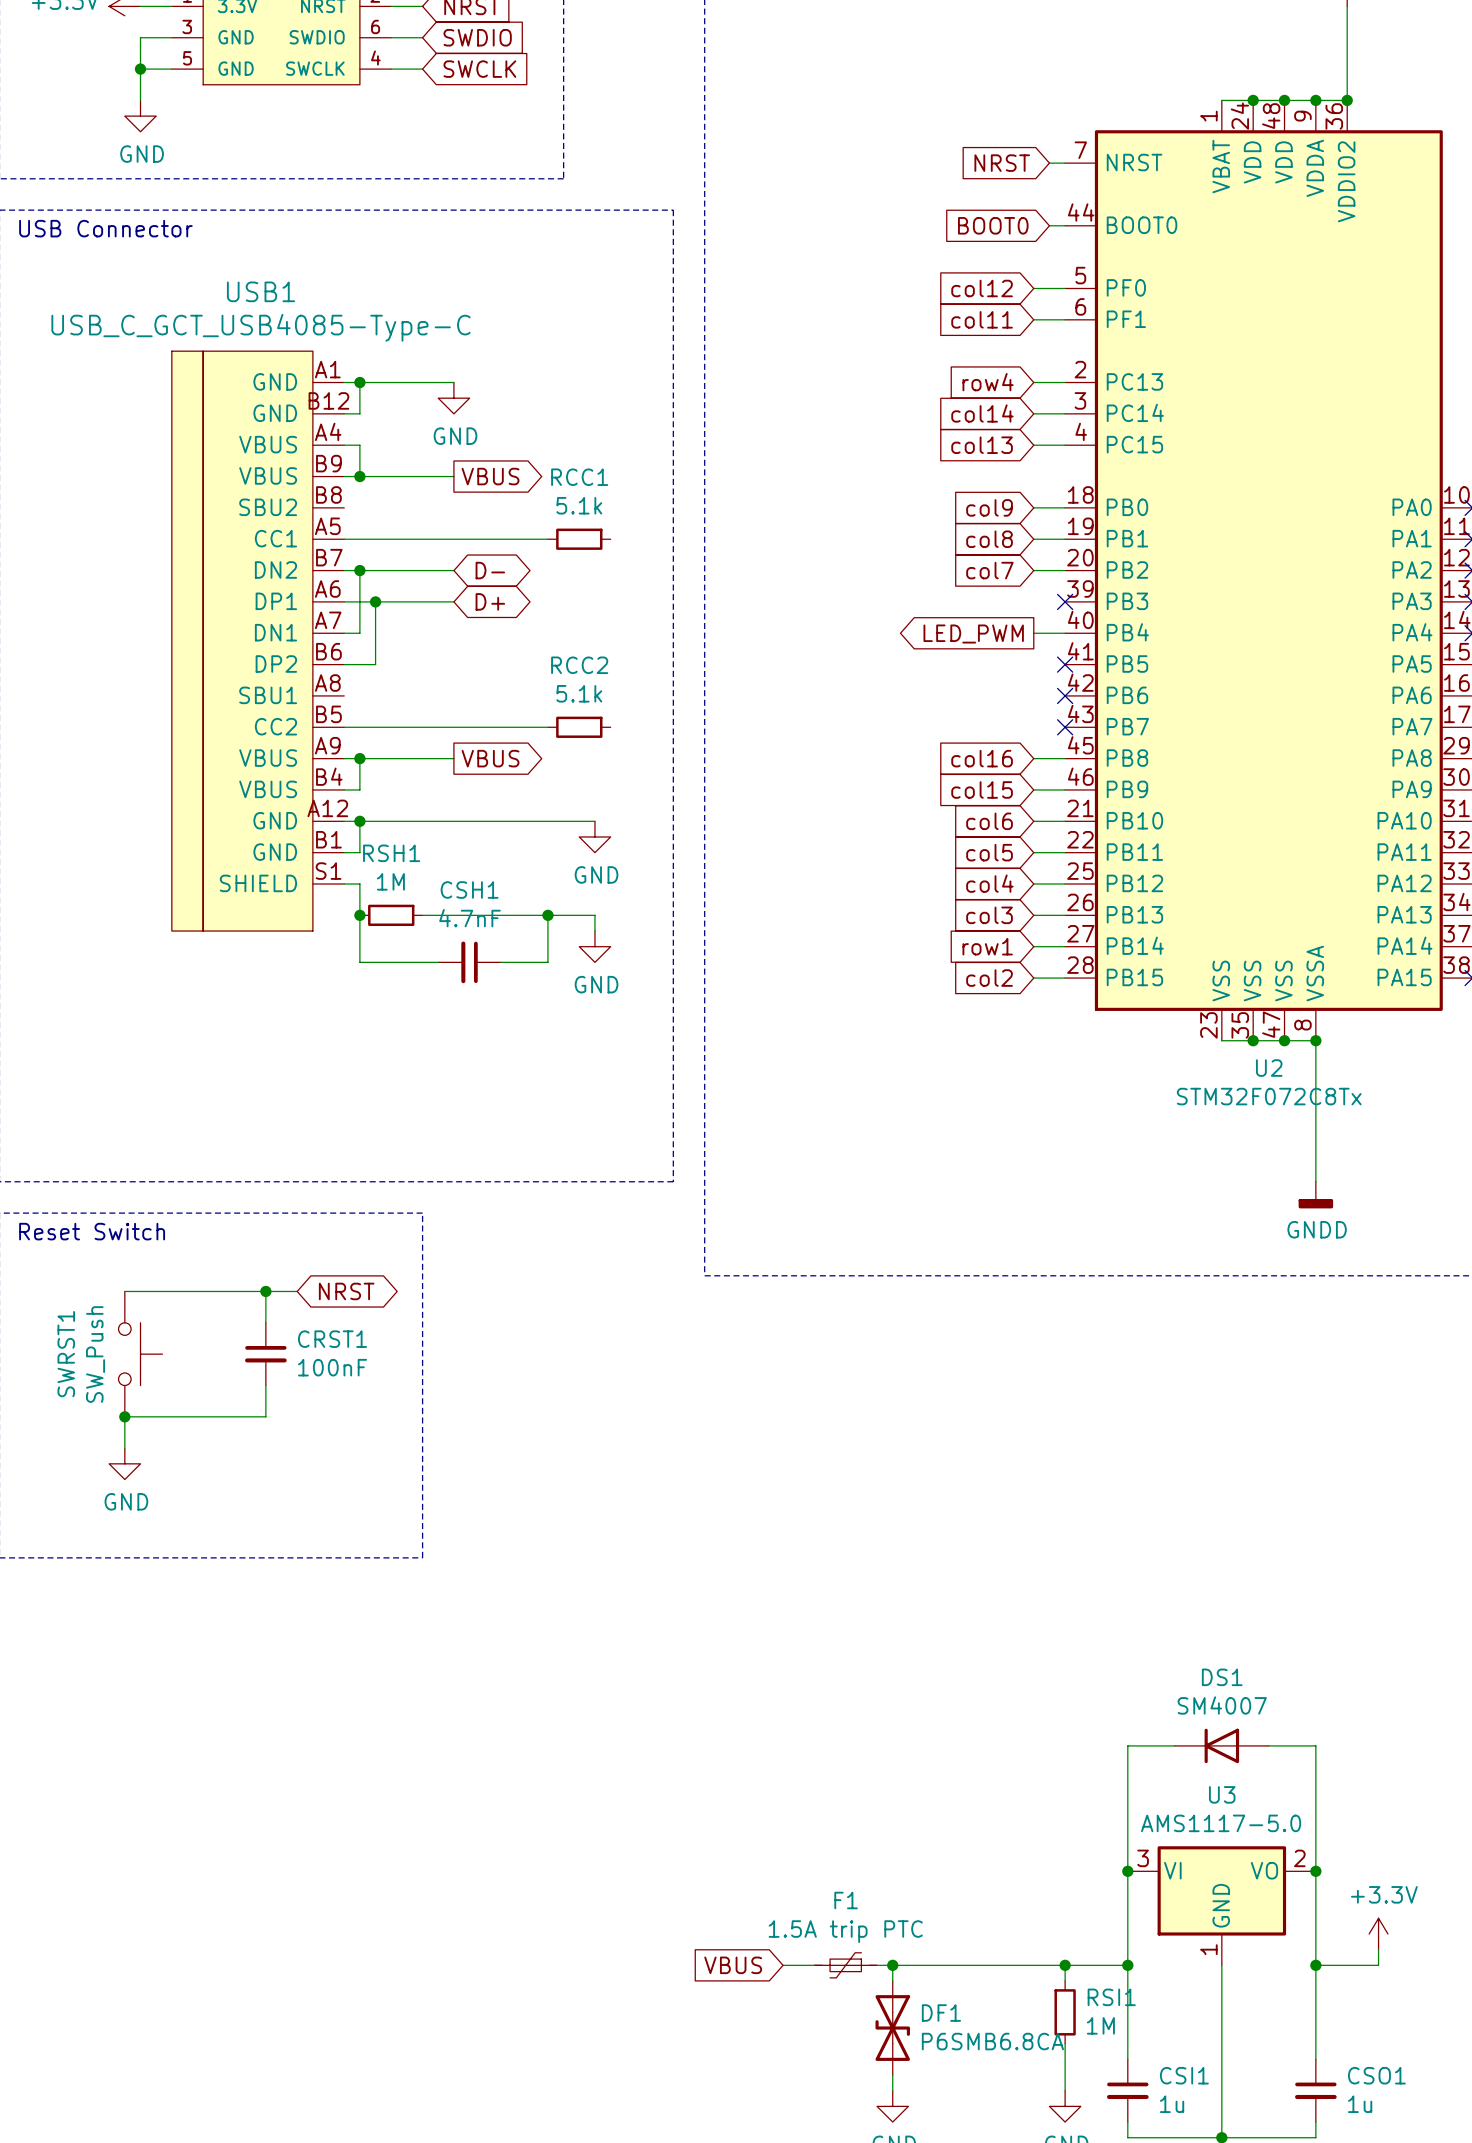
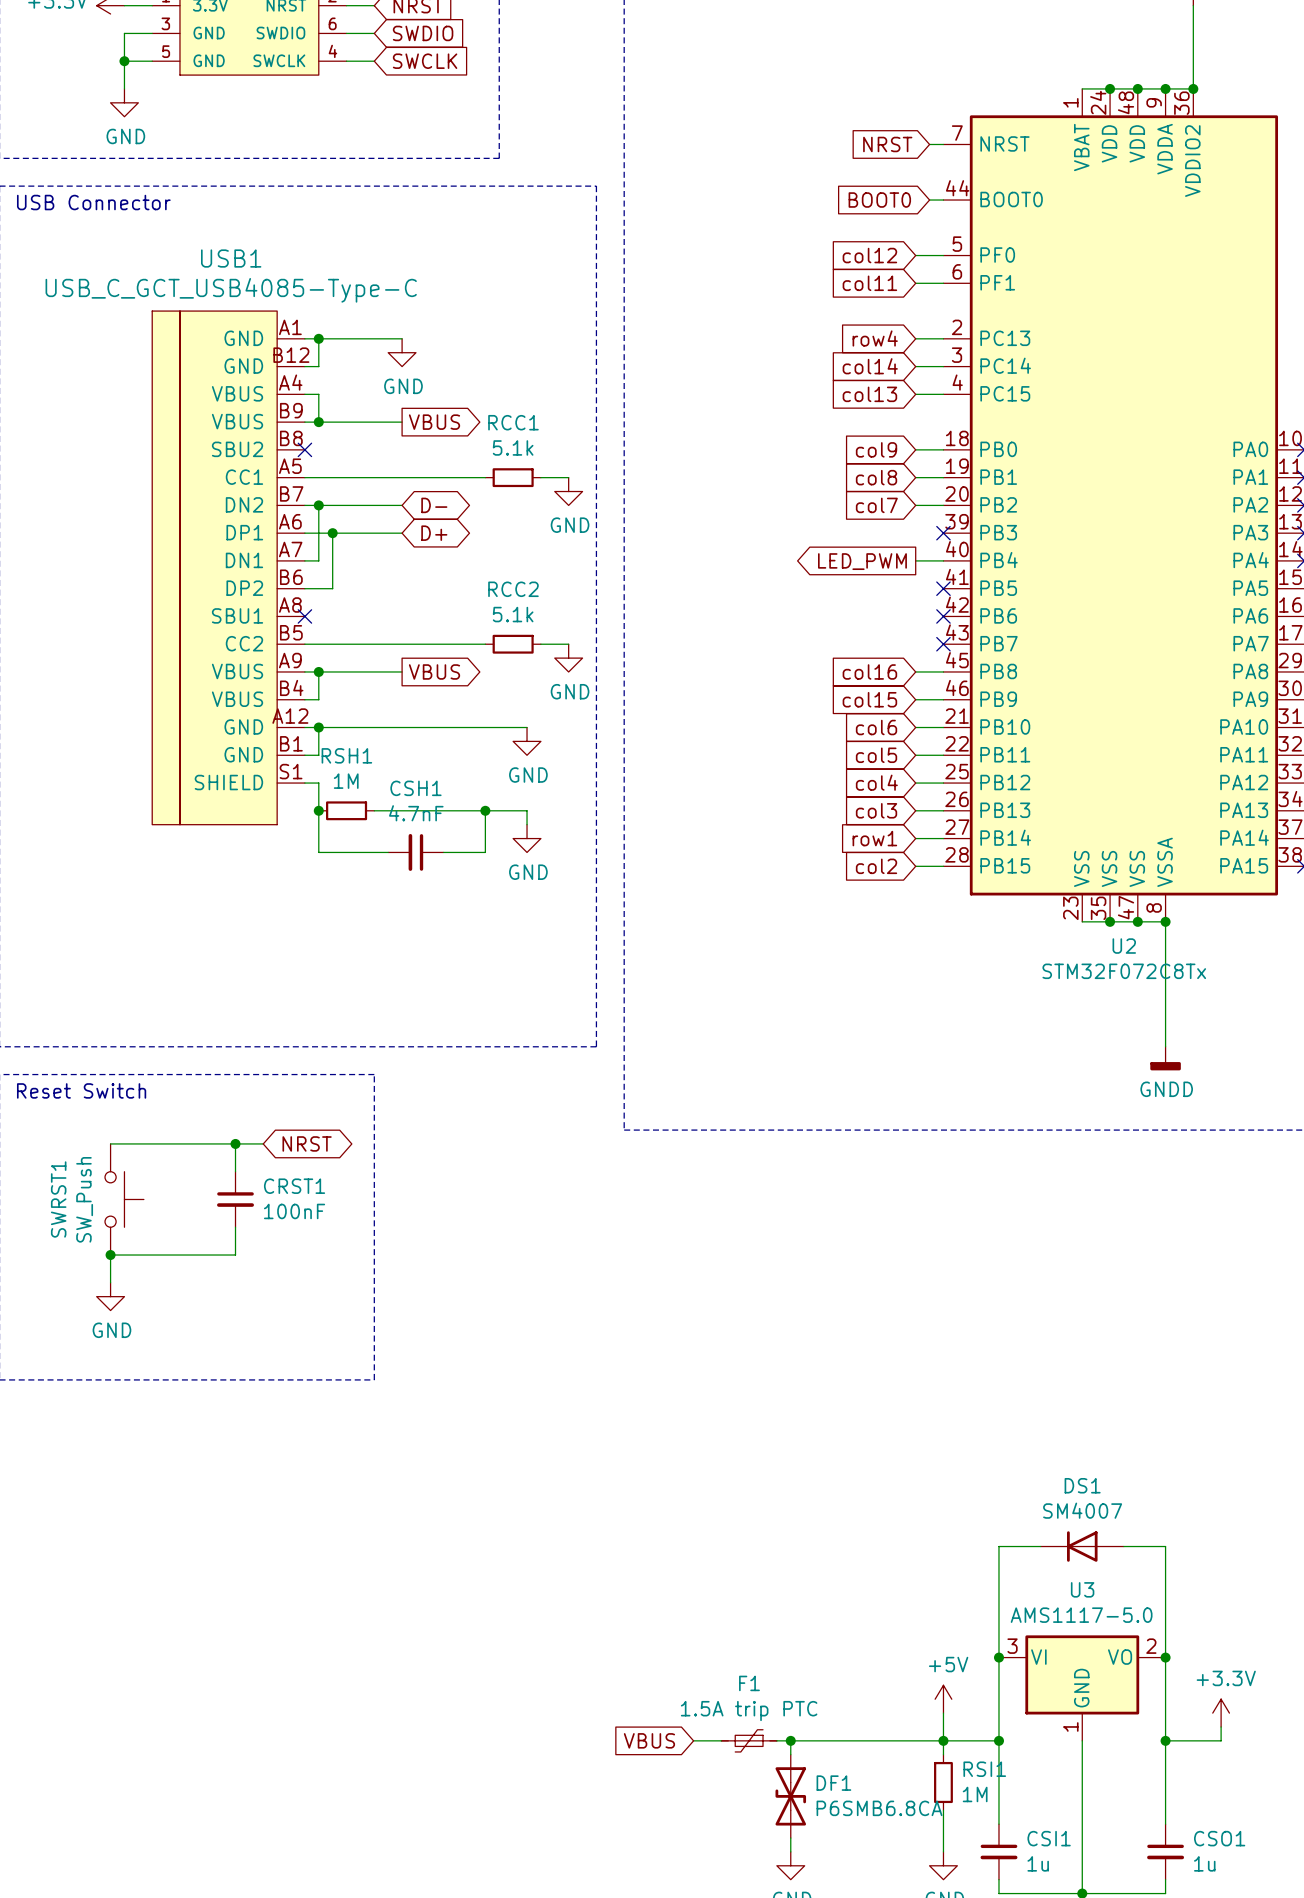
no-connect mark: none -> (304, 449)
wire: none -> (540, 477) (568, 477)
power symbol: none -> GND (568, 491)
no-connect mark: none -> (304, 616)
wire: none -> (540, 644) (568, 644)
power symbol: none -> GND (568, 658)
power symbol: none -> +5V (943, 1699)
wire: none -> (943, 1713) (943, 1740)

